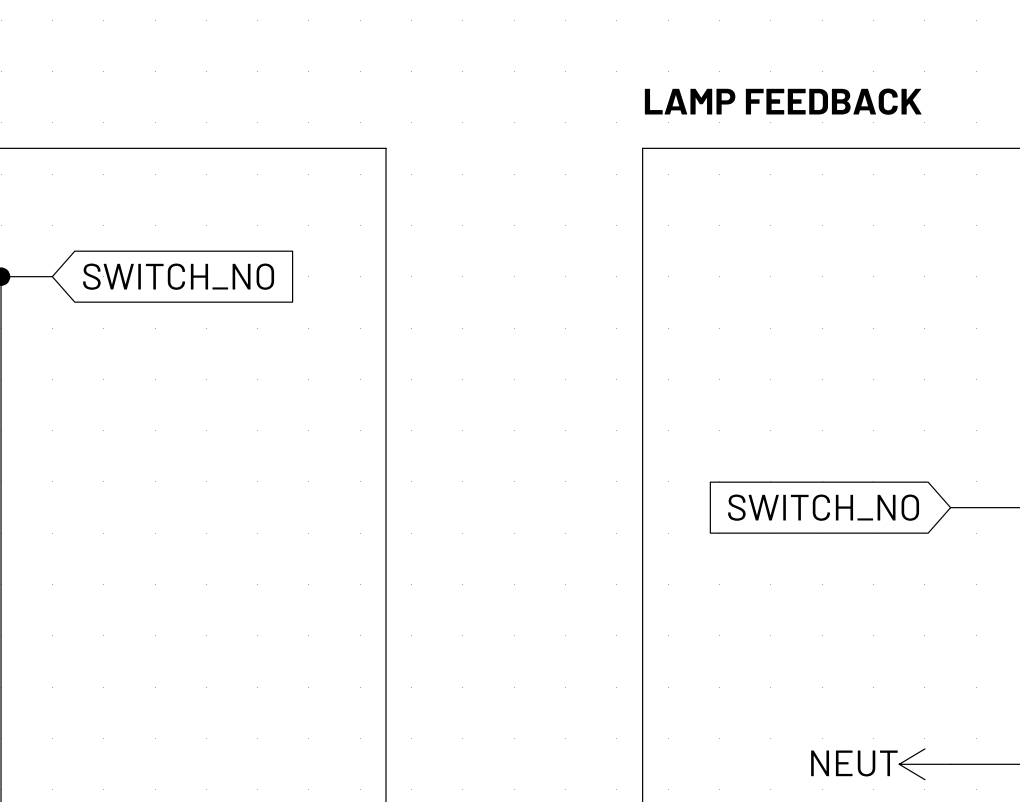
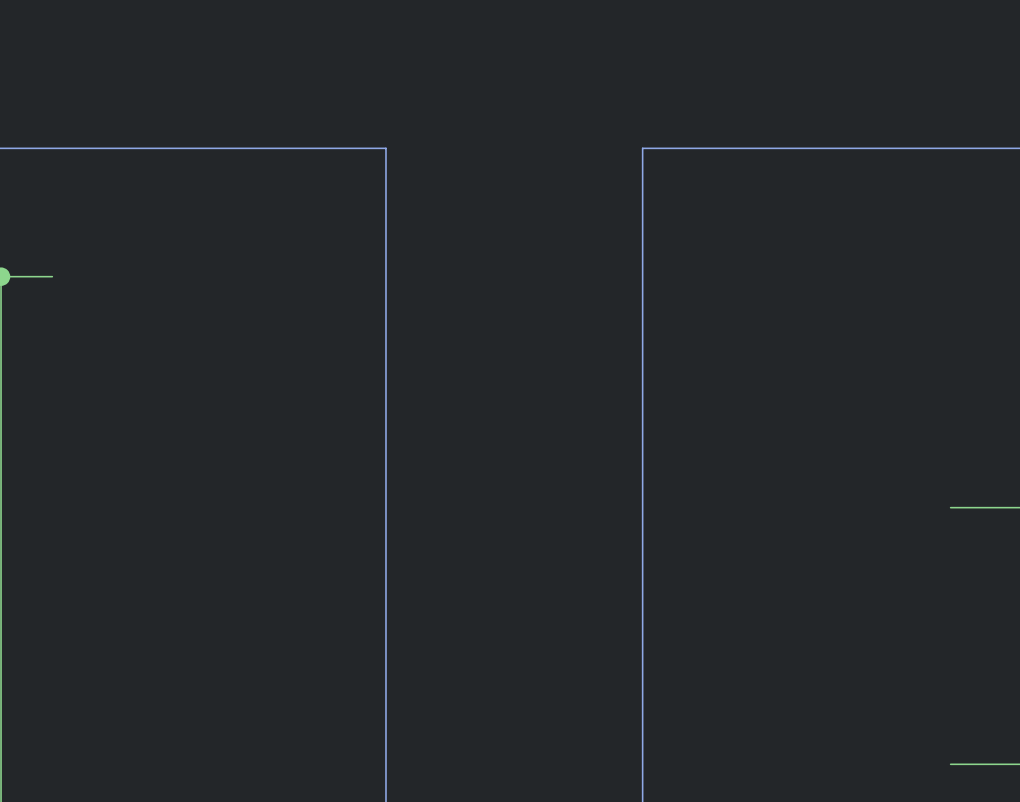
text: LAMP FEEDBACK (783, 101) -> none
global label: SWITCH_NO (178, 276) -> none
global label: SWITCH_NO (823, 507) -> none
power symbol: NEUT (924, 764) -> none

